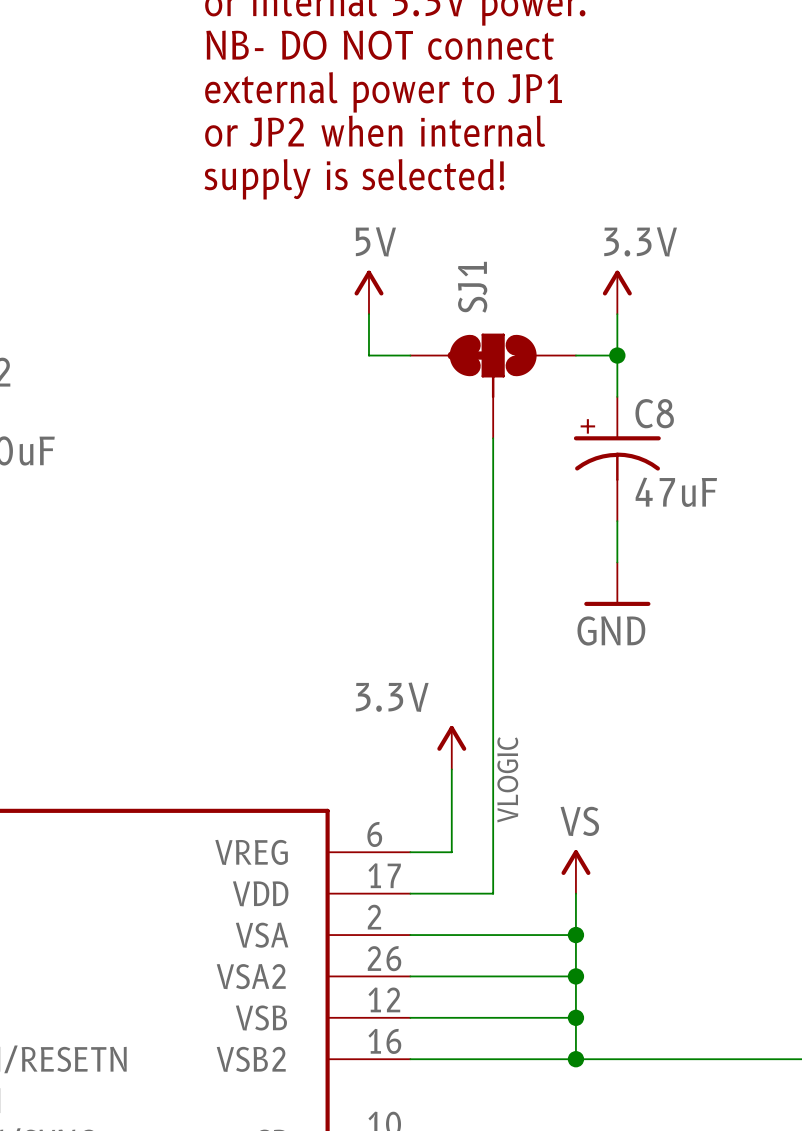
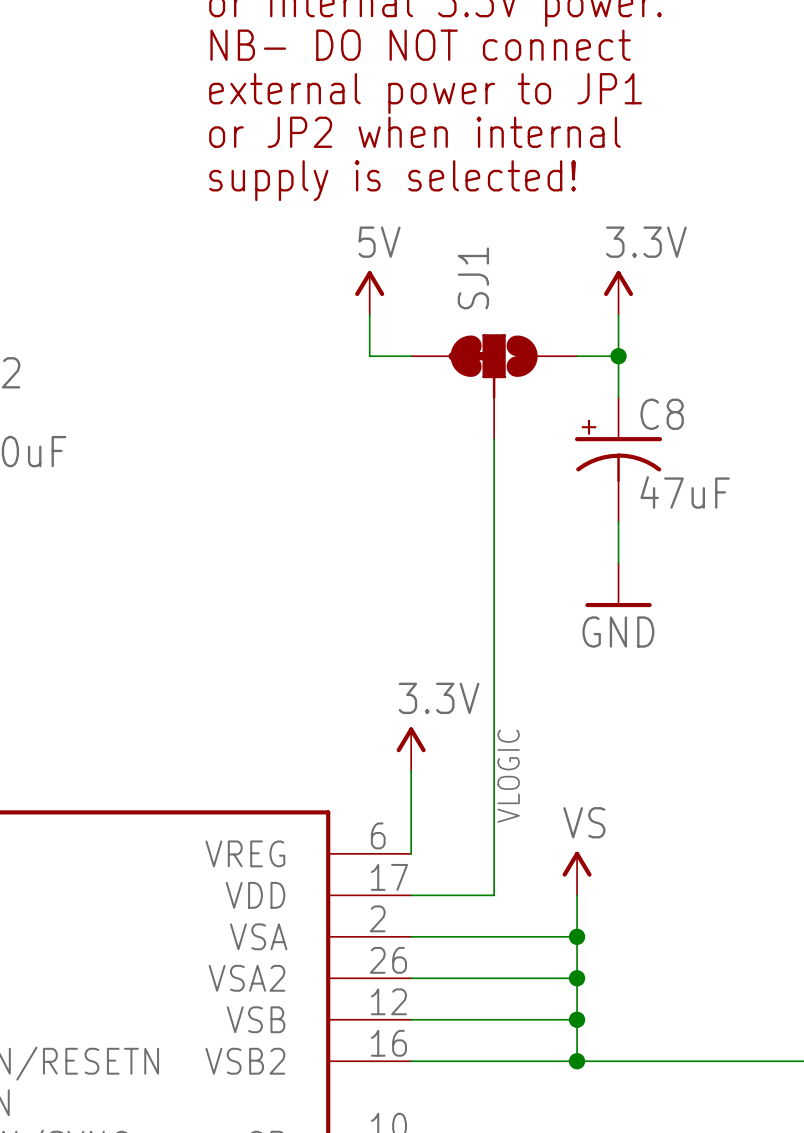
power symbol text position: 3.3V (392, 697) -> 3.3V (439, 698)
power symbol position: 3.3V (451, 747) -> 3.3V (411, 749)
wire: (451, 769) (451, 852) (410, 852) -> (411, 770) (411, 853)

